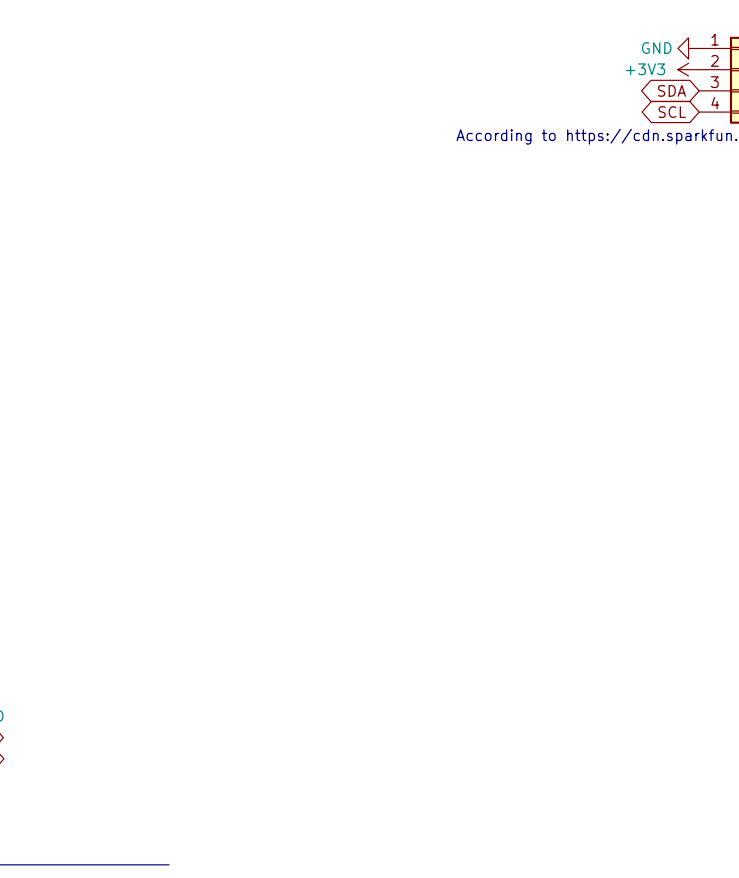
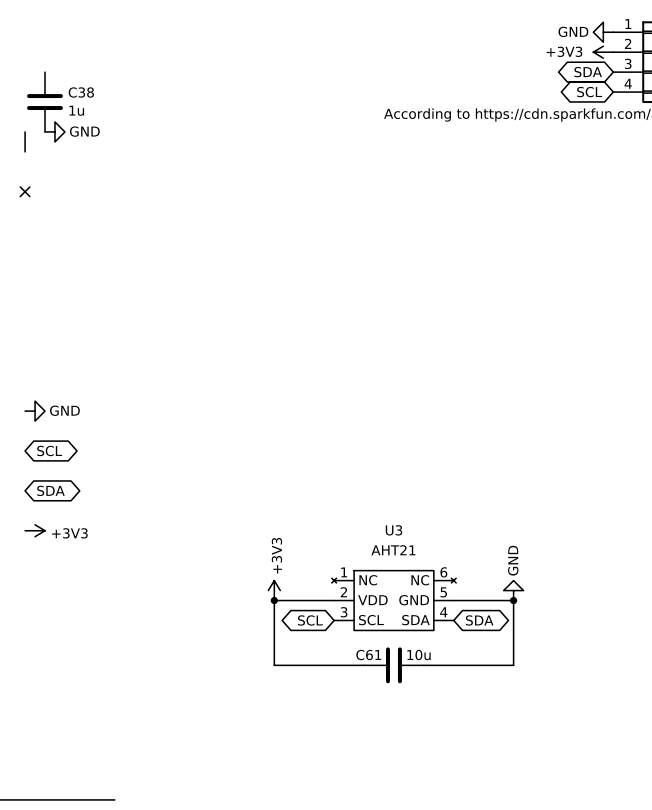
C38: none -> 1u (45, 102)
wire: none -> (25, 131) (25, 151)
power symbol: none -> GND (54, 131)
no-connect mark: none -> (25, 191)
power symbol: none -> GND (35, 411)
global label: none -> SCL (49, 451)
global label: none -> SDA (50, 490)
power symbol: none -> +3V3 (35, 530)
power symbol: none -> +3V3 (274, 590)
power symbol: none -> GND (513, 590)
junction: none -> (274, 600)
wire: none -> (334, 600) (274, 600) (274, 665) (364, 665)
U3: none -> AHT21 (393, 600)
wire: none -> (453, 600) (513, 600) (513, 665) (423, 665)
junction: none -> (513, 600)
global label: none -> SCL (310, 620)
global label: none -> SDA (479, 620)
C61: none -> 10u (393, 665)

